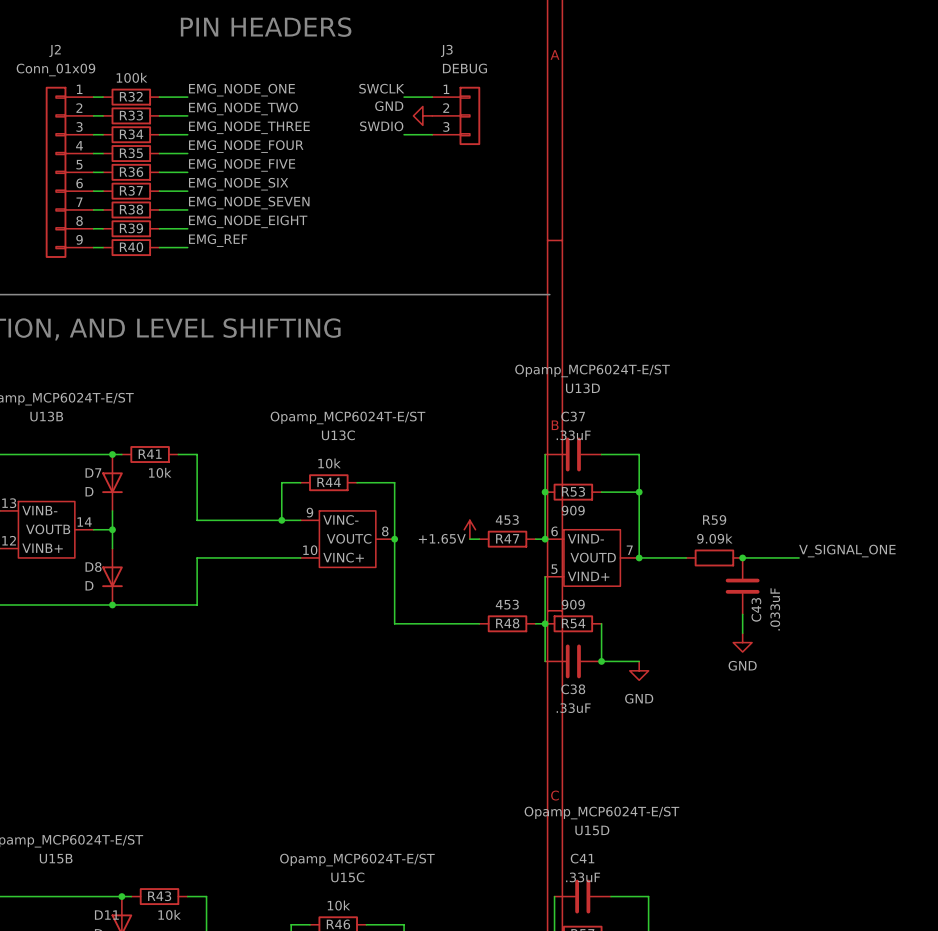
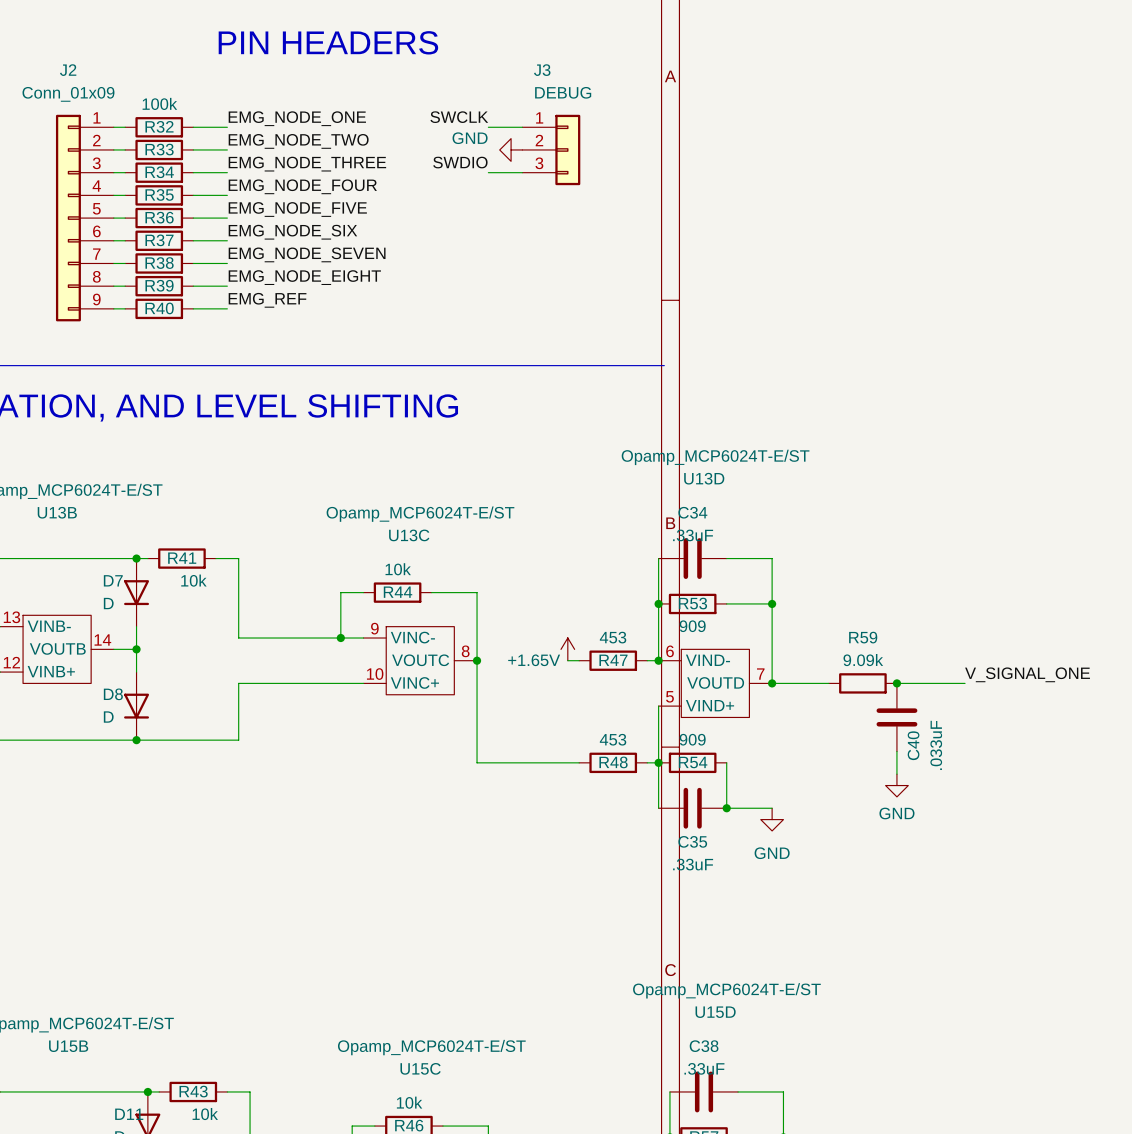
C37 name: C37 (573, 416) -> C34 (692, 512)
C43 name: C43 (756, 609) -> C40 (913, 745)
C38 name: C38 (573, 689) -> C35 (692, 841)
C41 name: C41 (582, 858) -> C38 (704, 1046)

